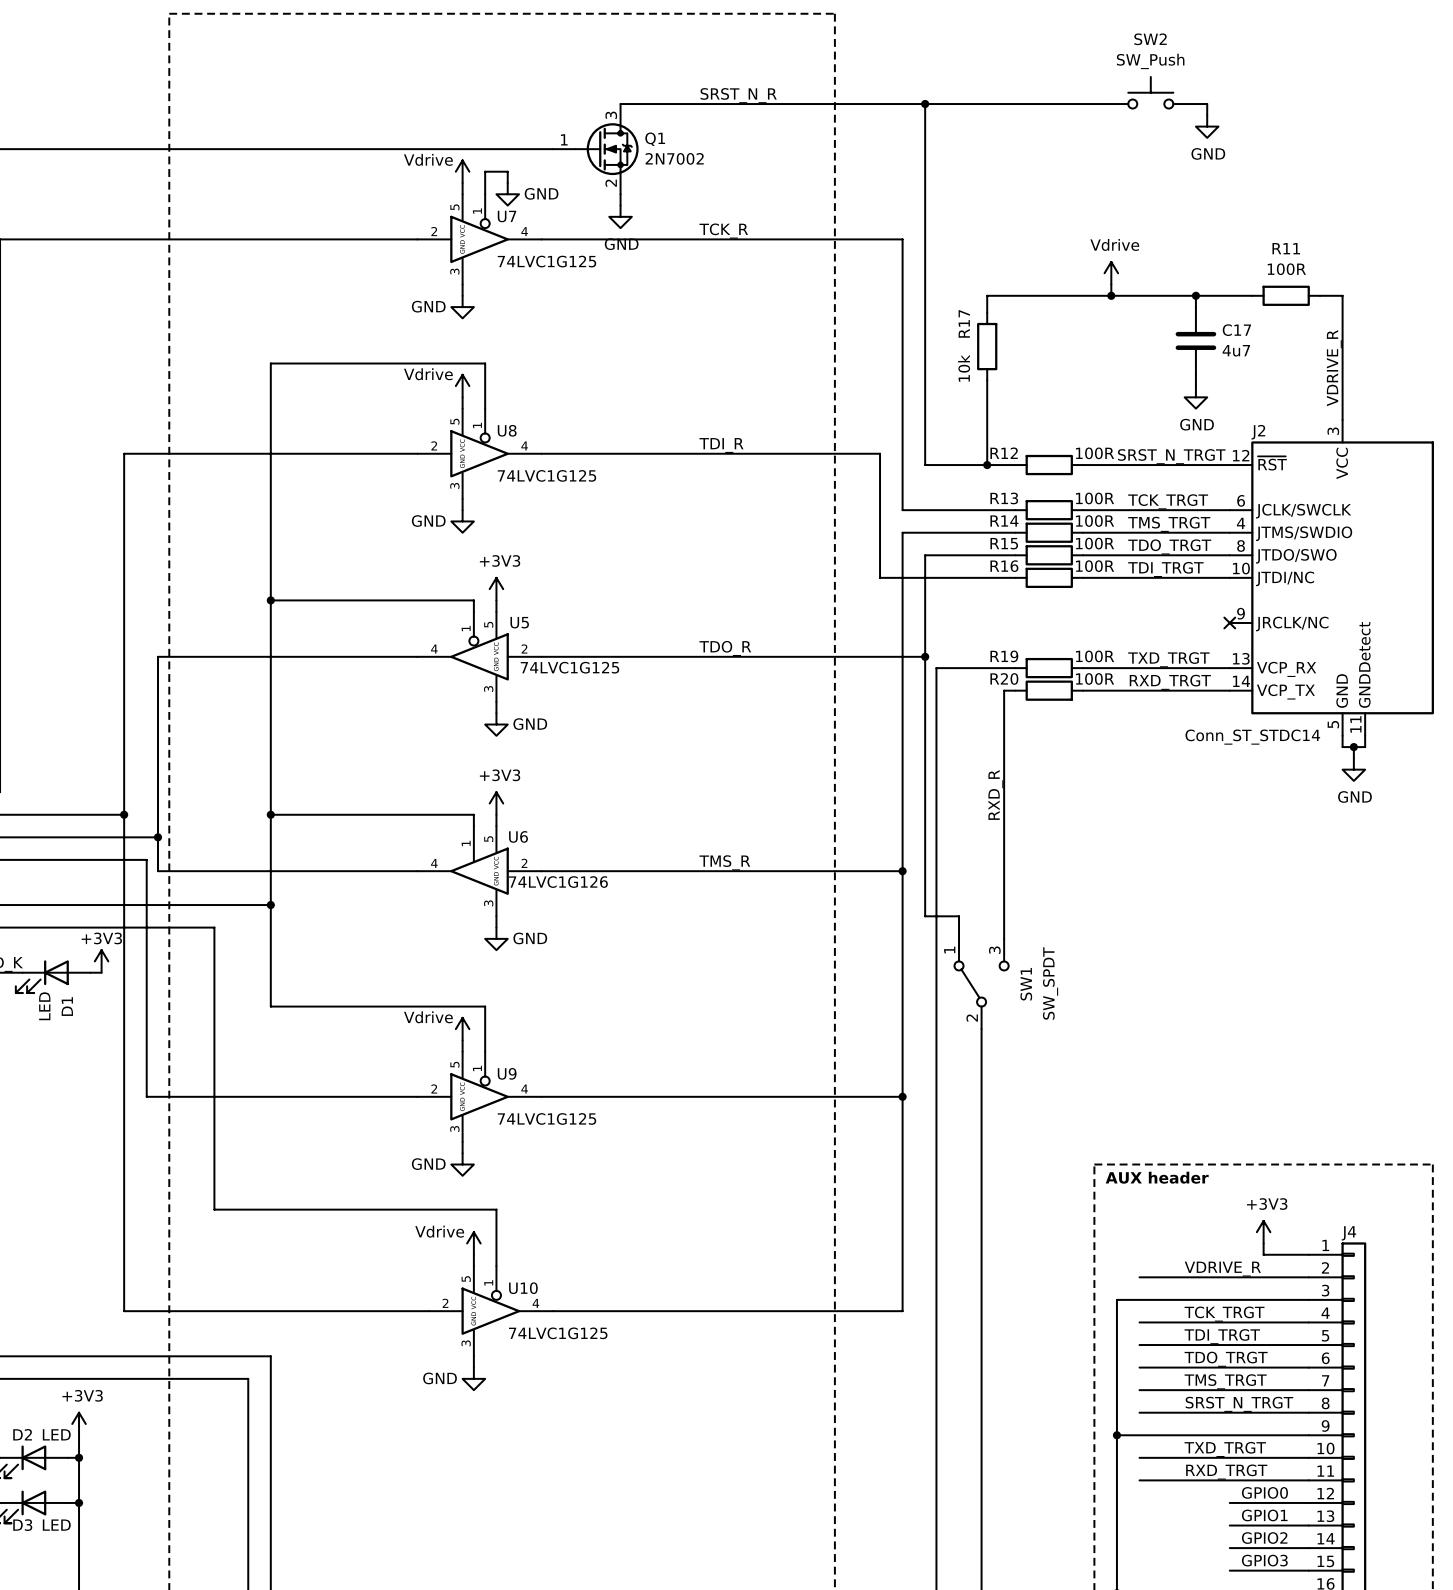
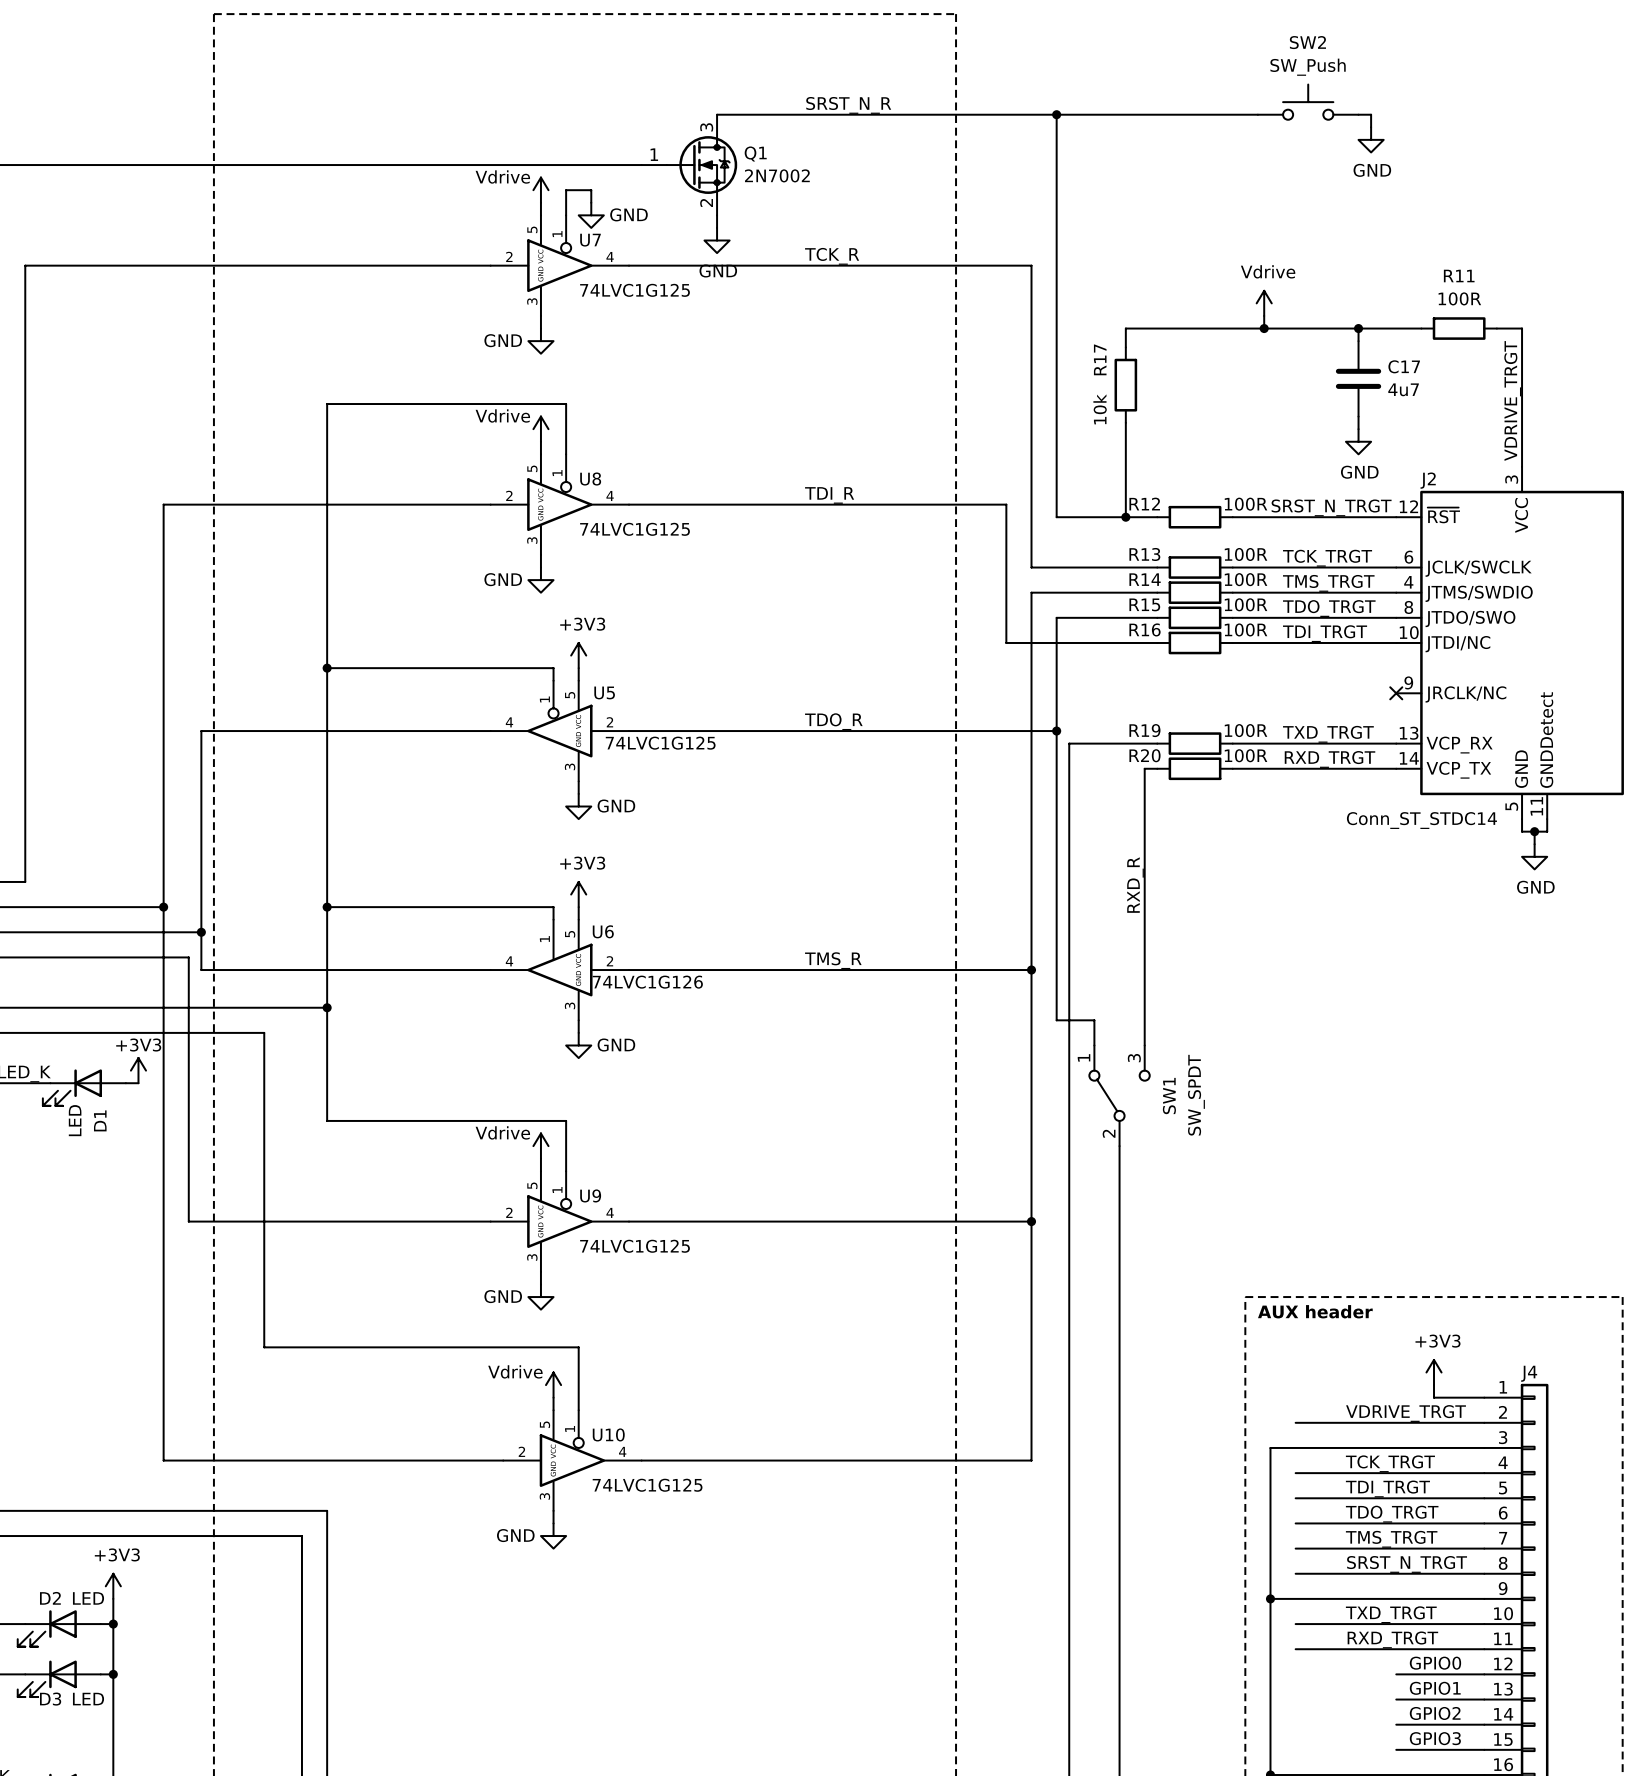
label: VDRIVE_R (1334, 368) -> VDRIVE_TRGT (1512, 400)
label: VDRIVE_R (1222, 1269) -> VDRIVE_TRGT (1406, 1413)

